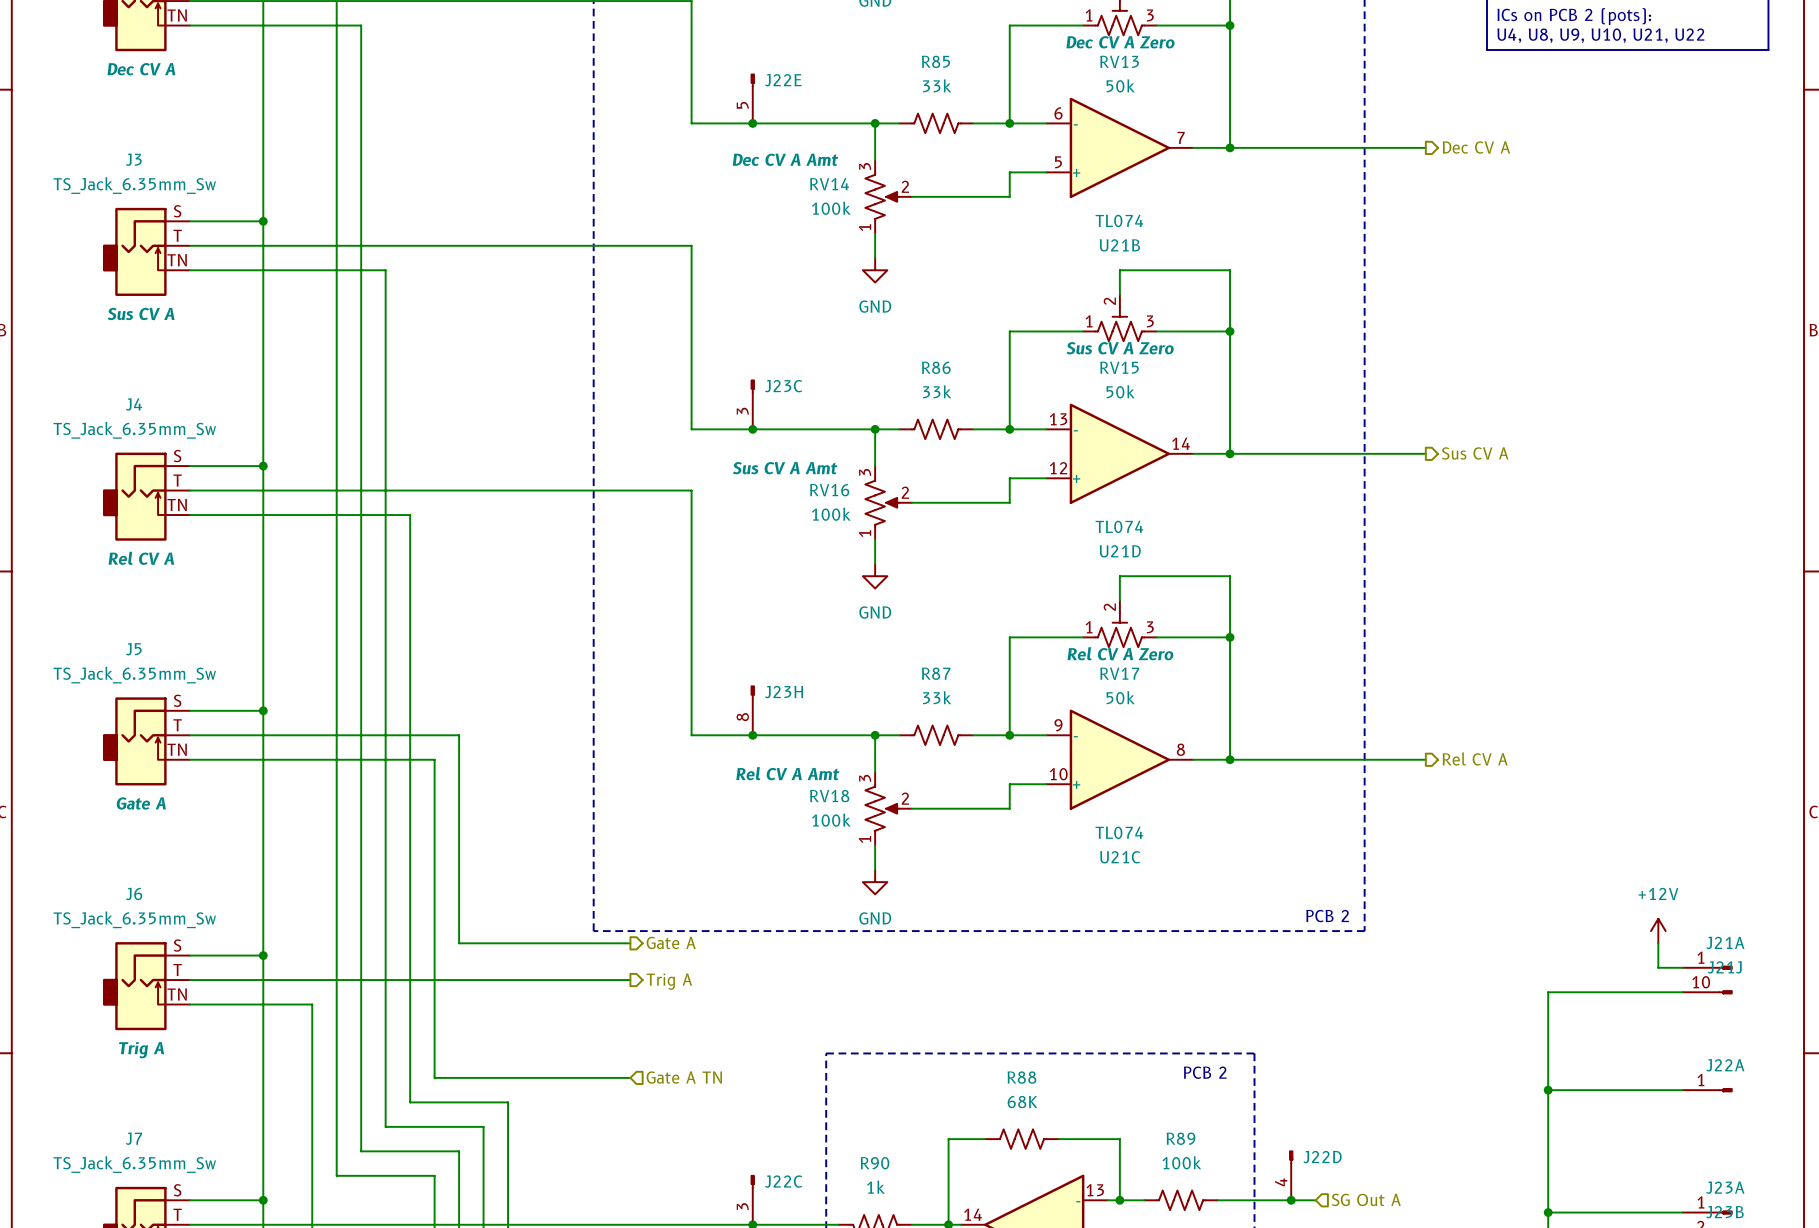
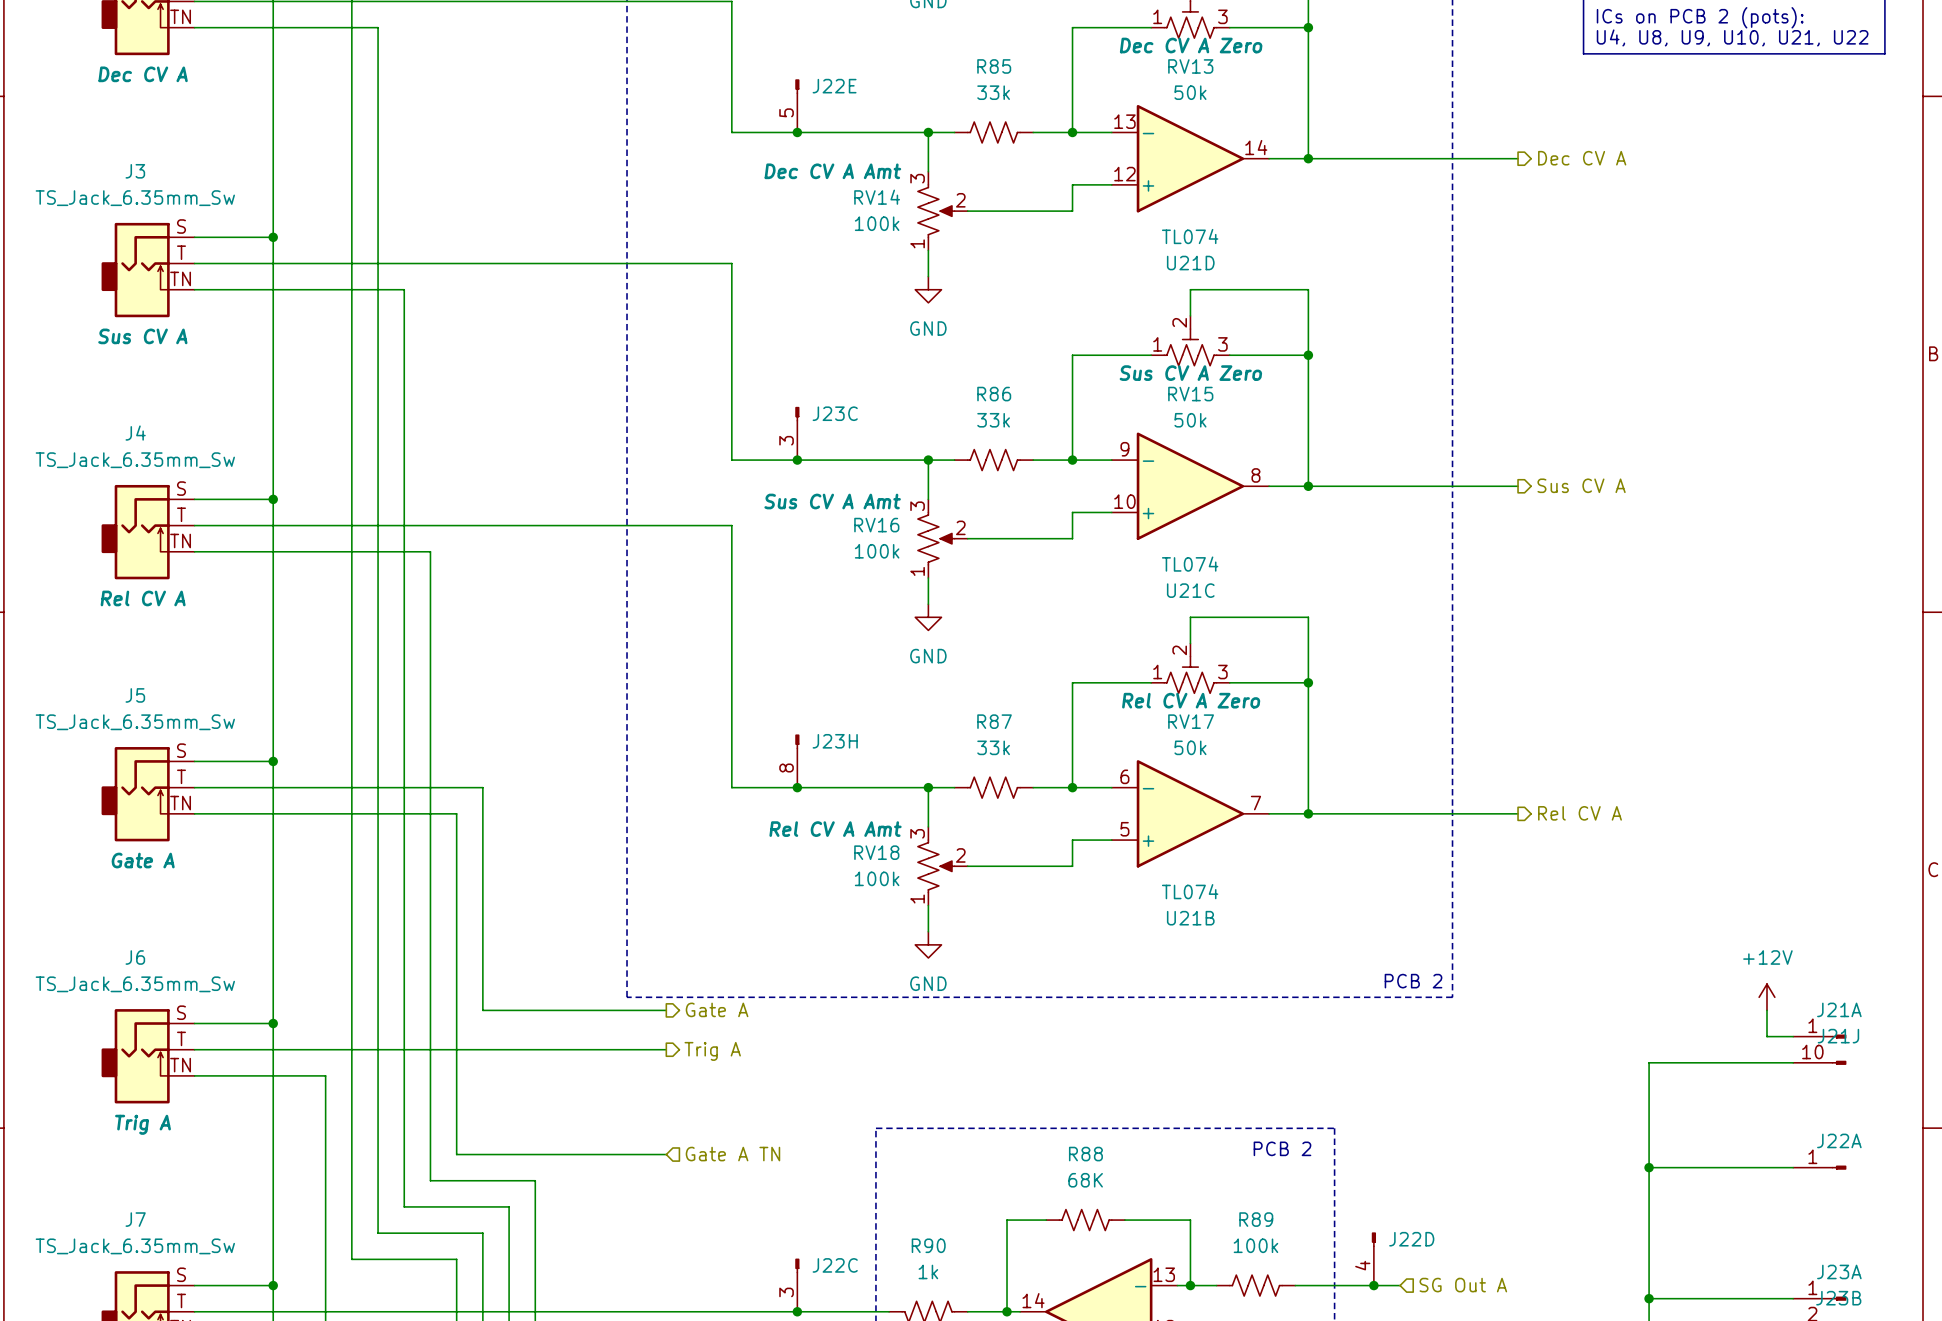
U21B position: (1119, 147) -> (1190, 813)
U21D position: (1119, 453) -> (1190, 158)
U21C position: (1119, 759) -> (1190, 486)

